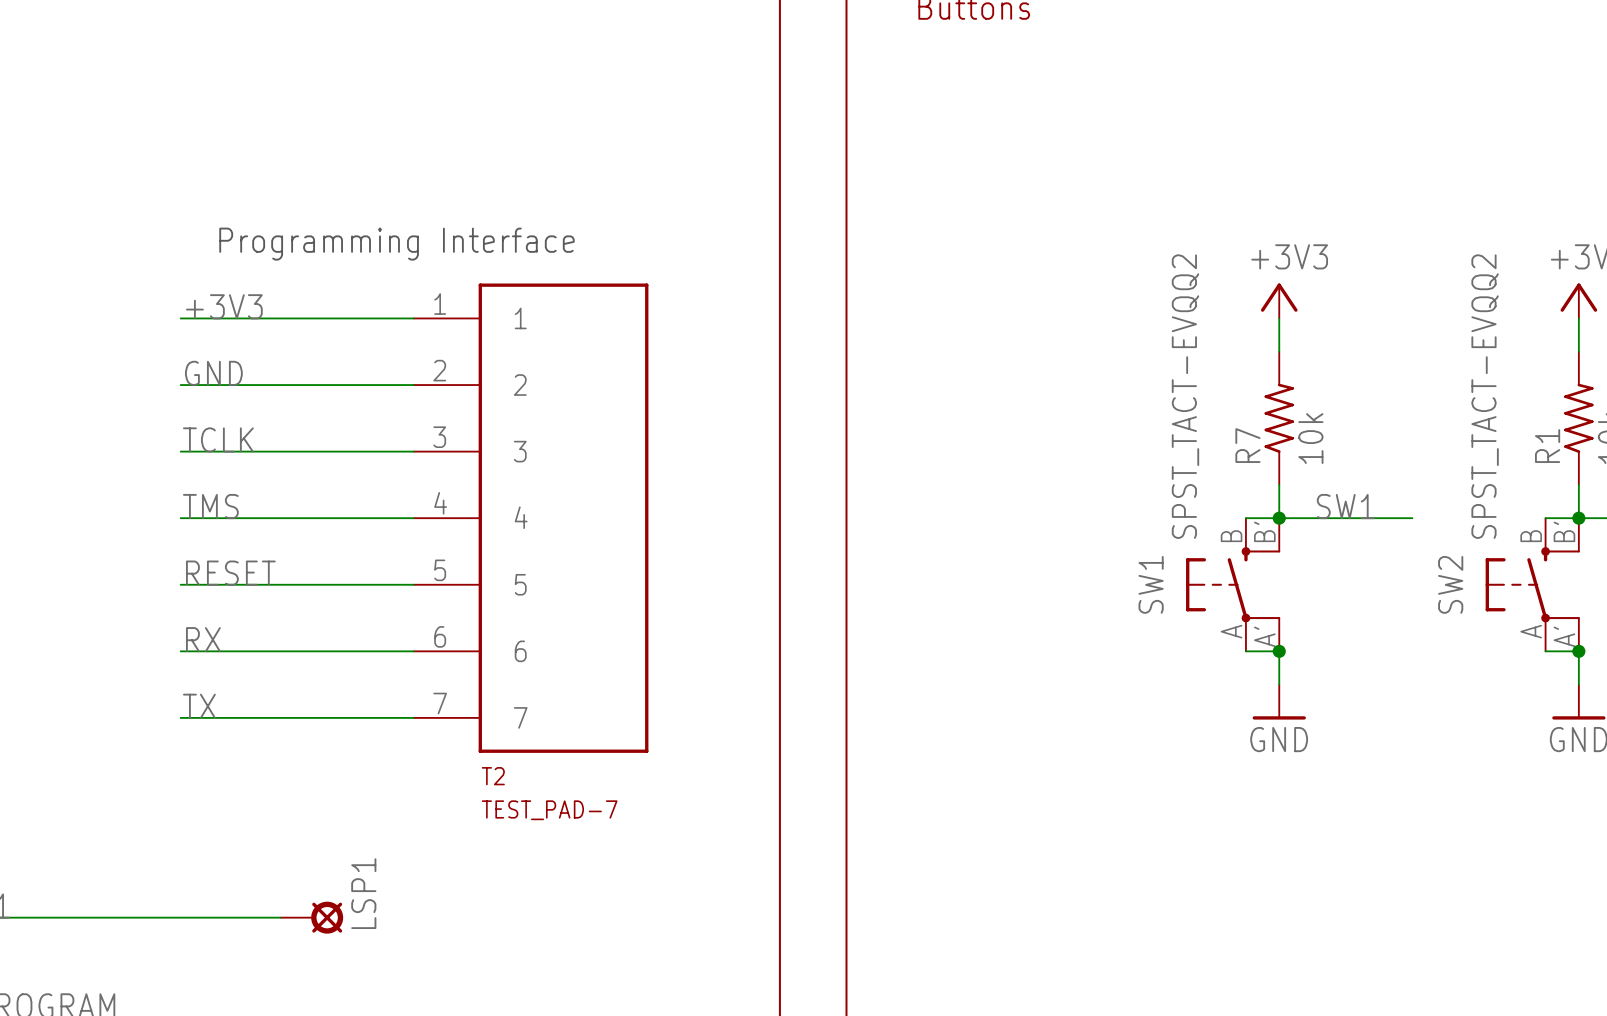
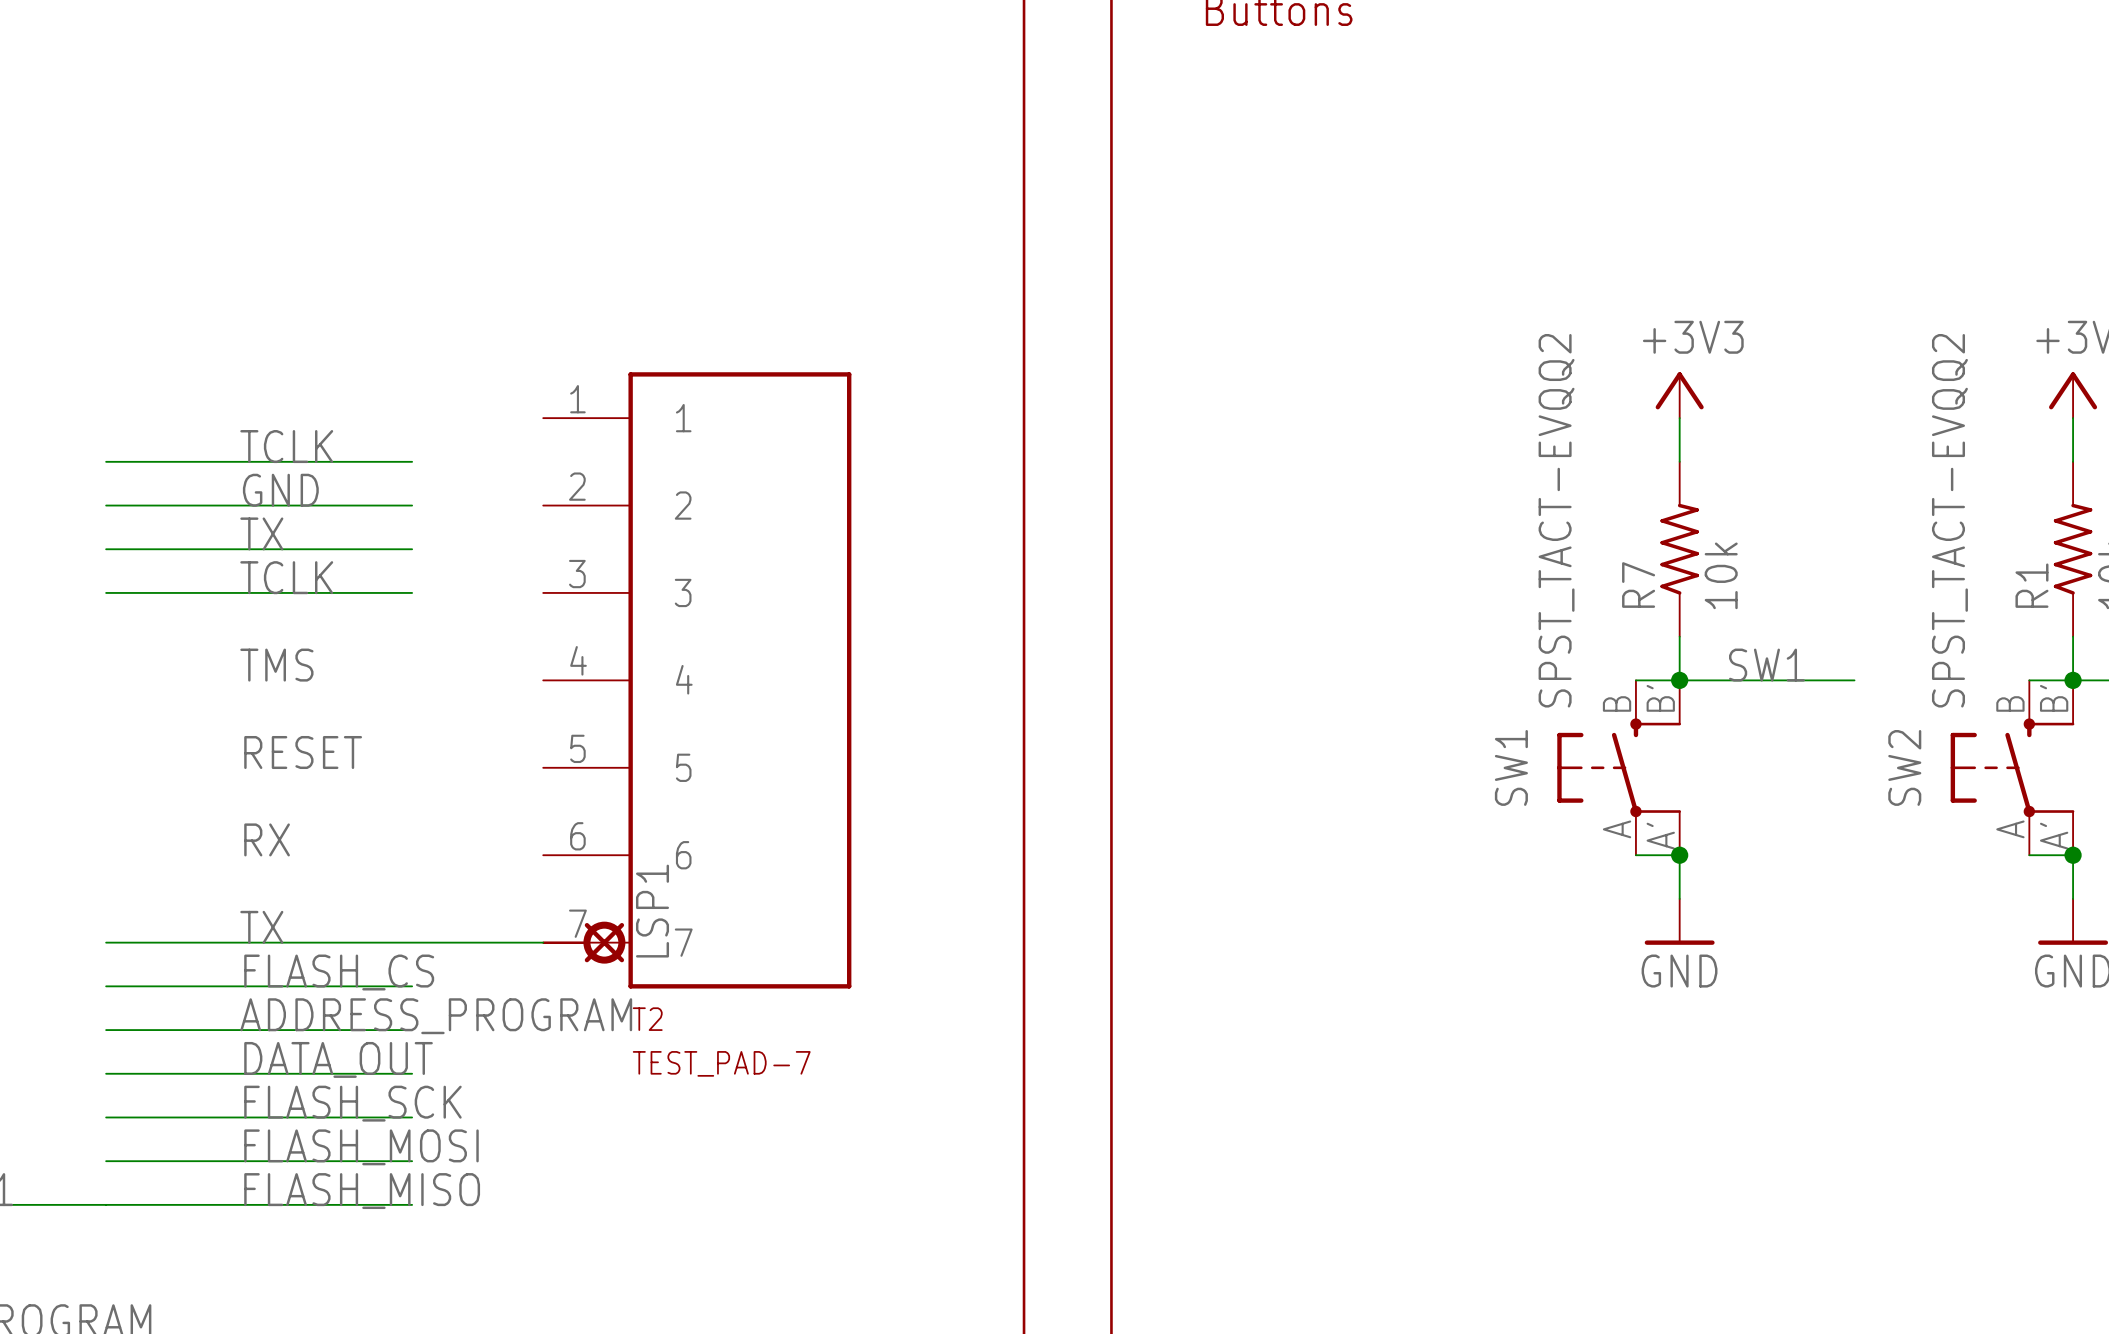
text: Programming Interface (396, 244) -> none
label: +3V3 (224, 306) -> none
wire: (180, 318) (413, 318) -> (106, 549) (412, 549)
label: none -> TCLK (286, 446)
wire: none -> (106, 461) (412, 461)
wire: (313, 385) (413, 385) -> (106, 505) (237, 505)
label: none -> TX (261, 533)
wire: (313, 451) (413, 451) -> (106, 592) (237, 592)
wire: (180, 518) (413, 518) -> (106, 986) (412, 986)
wire: (180, 584) (413, 584) -> (106, 1073) (412, 1073)
wire: (180, 651) (413, 651) -> (106, 1161) (412, 1161)
wire: none -> (106, 942) (237, 942)
label: none -> FLASH_CS (339, 972)
label: none -> ADDRESS_PROGRAM (436, 1016)
wire: none -> (106, 1030) (412, 1030)
label: none -> DATA_OUT (338, 1059)
label: none -> FLASH_SCK (352, 1103)
wire: none -> (106, 1117) (412, 1117)
label: none -> FLASH_MOSI (361, 1147)
label: none -> FLASH_MISO (362, 1191)
LSP1 position: (311, 917) -> (584, 942)

